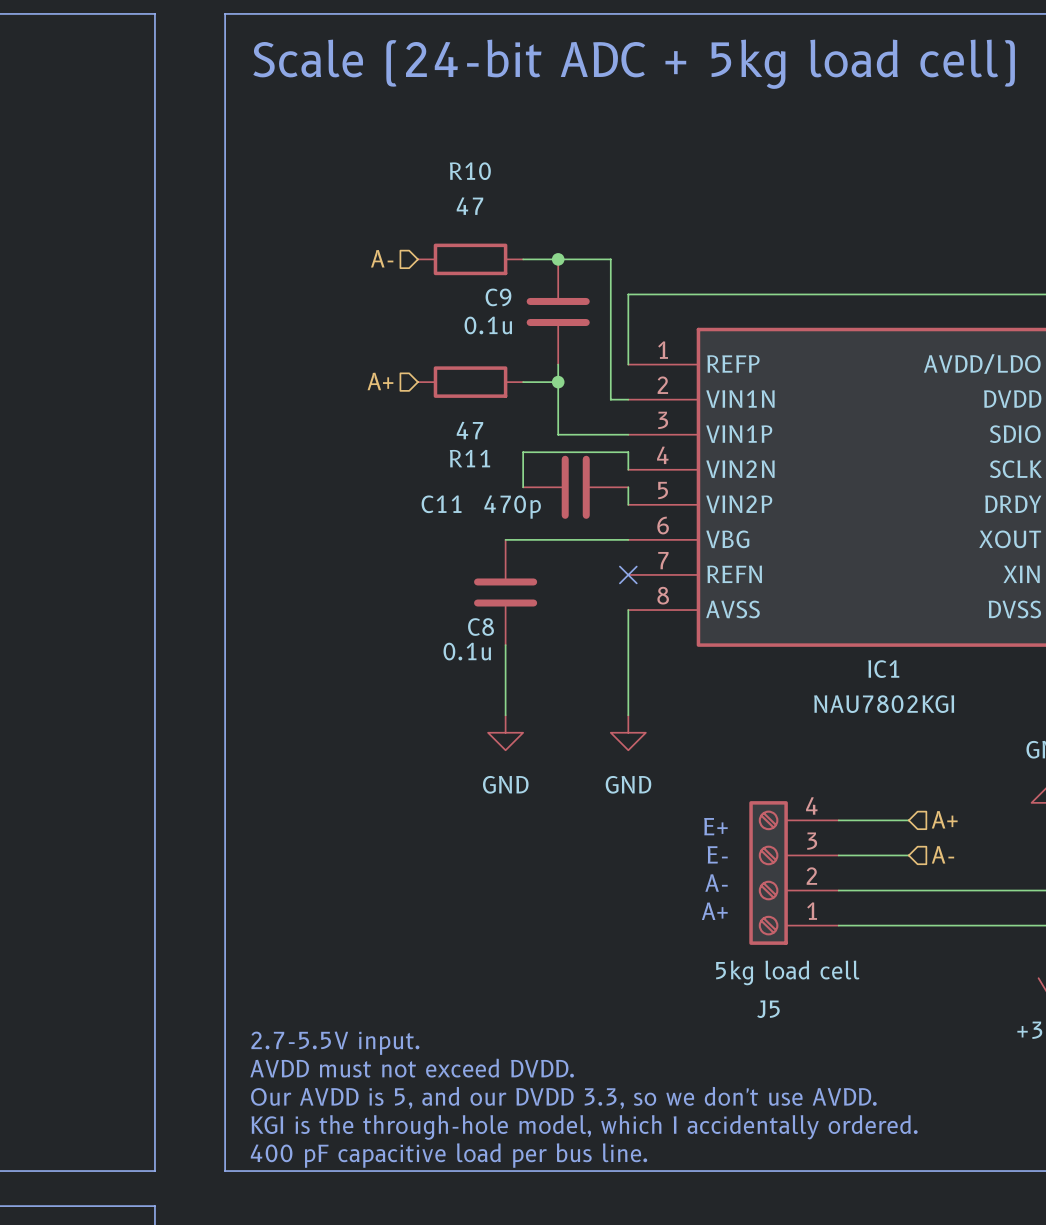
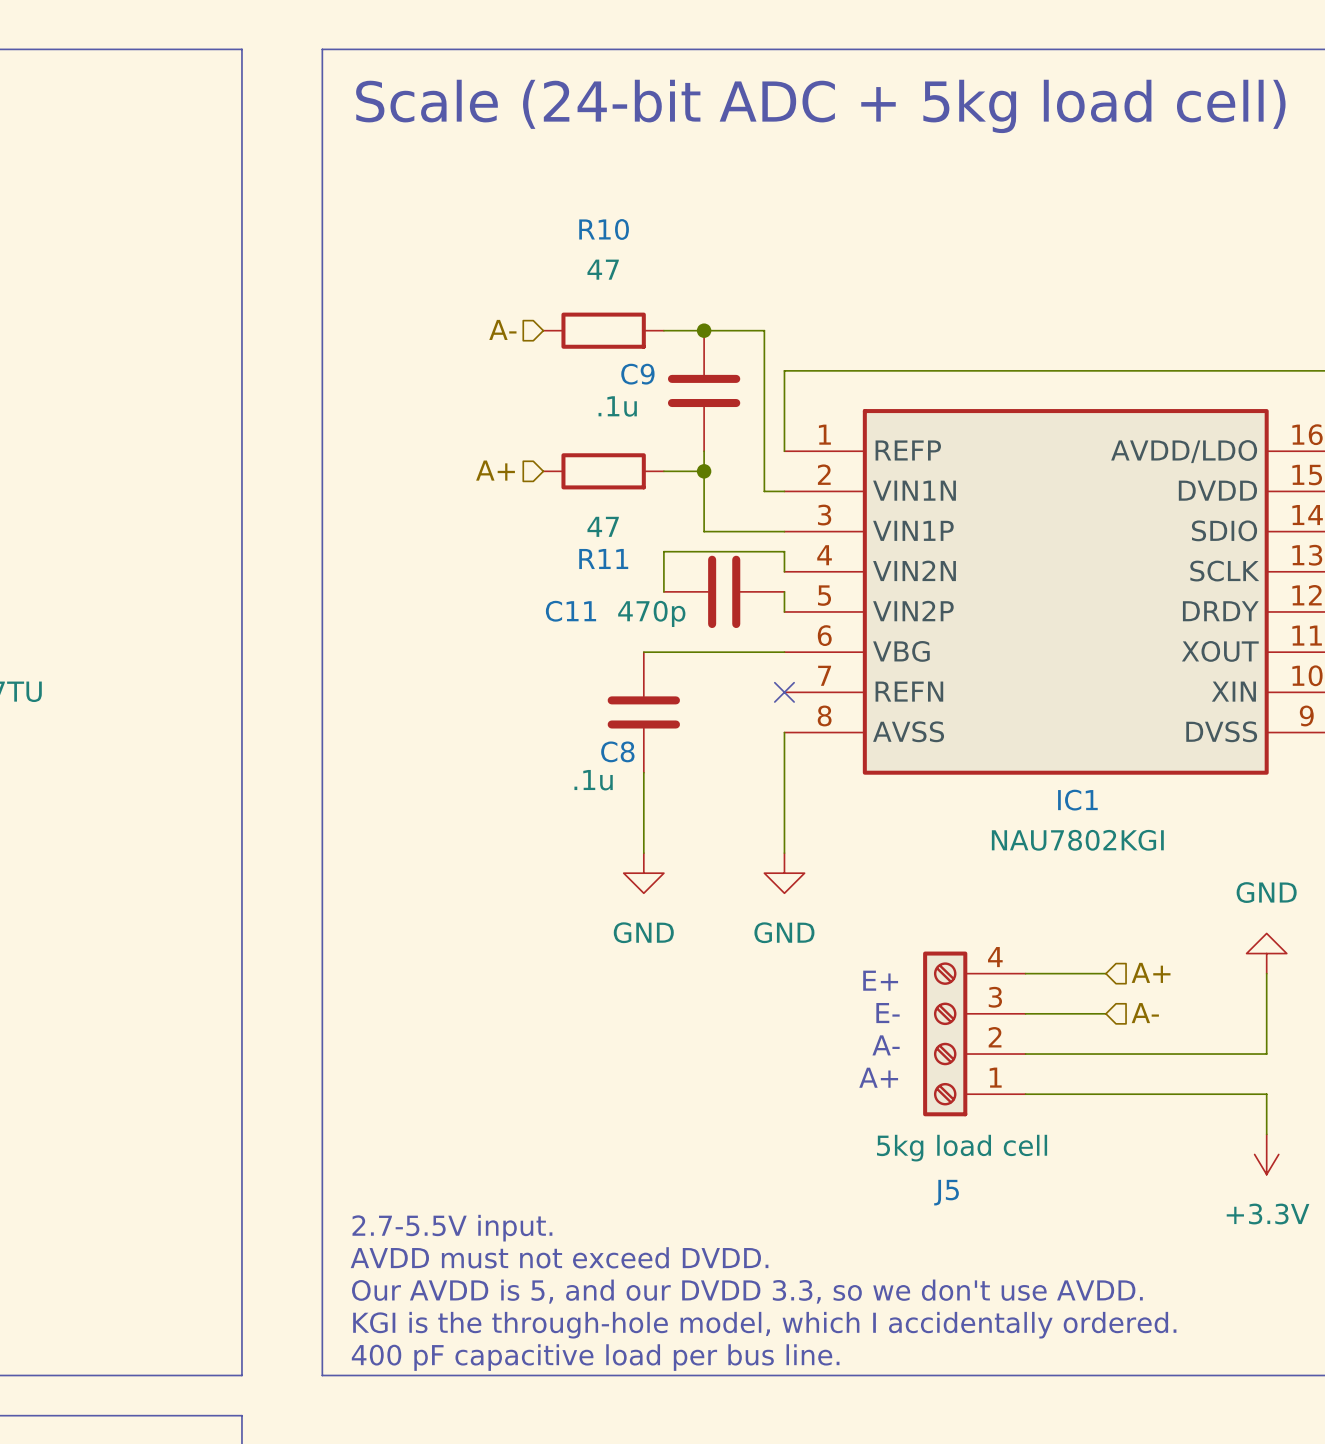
C9 value: 0.1u (488, 325) -> .1u (617, 406)
C8 value: 0.1u (467, 651) -> .1u (593, 780)

